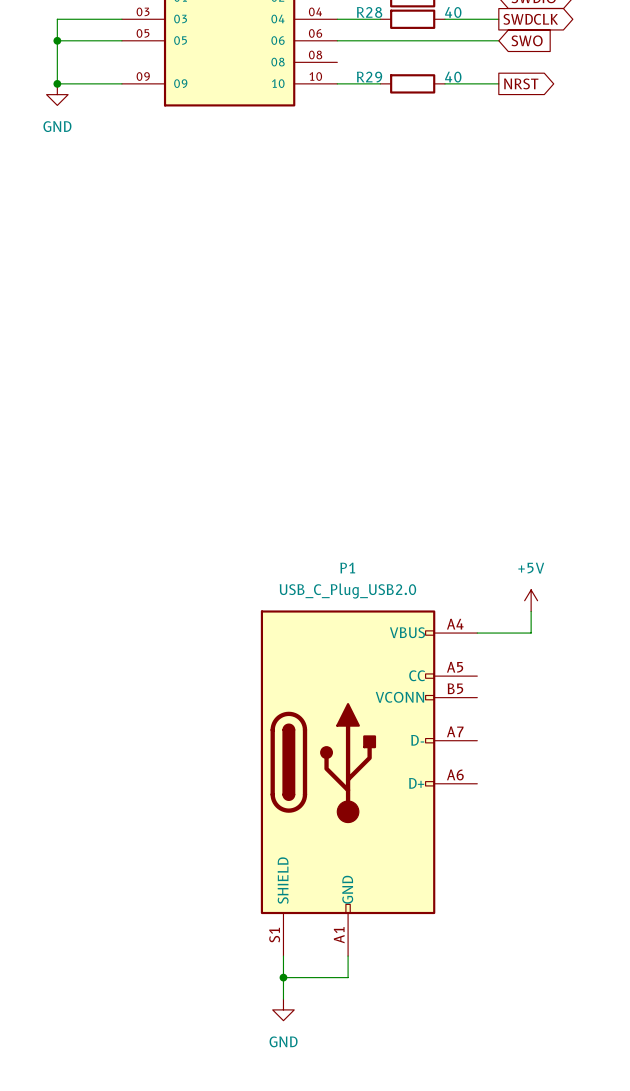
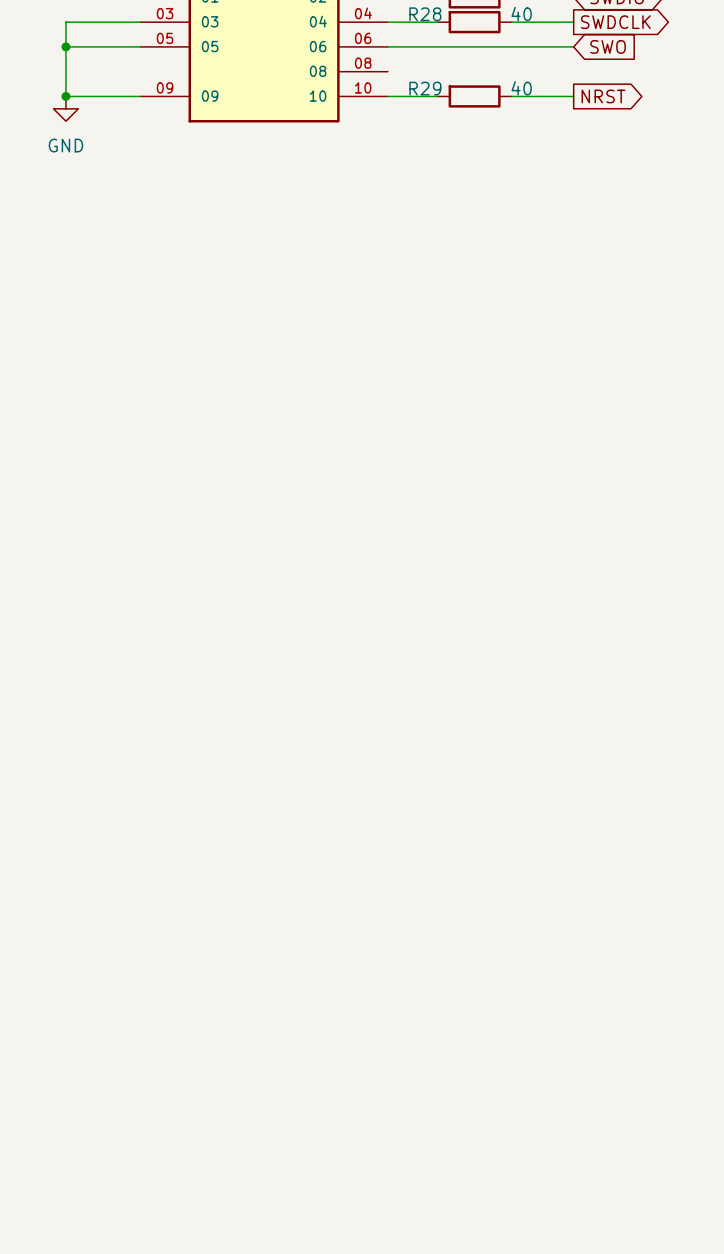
power symbol: +5V (531, 600) -> none
wire: (531, 611) (531, 633) (477, 633) -> none
P1: USB_C_Plug_USB2.0 (369, 783) -> none
wire: (283, 956) (283, 999) -> none
wire: (348, 956) (348, 977) (283, 977) -> none
junction: (283, 977) -> none
power symbol: GND (283, 1009) -> none

